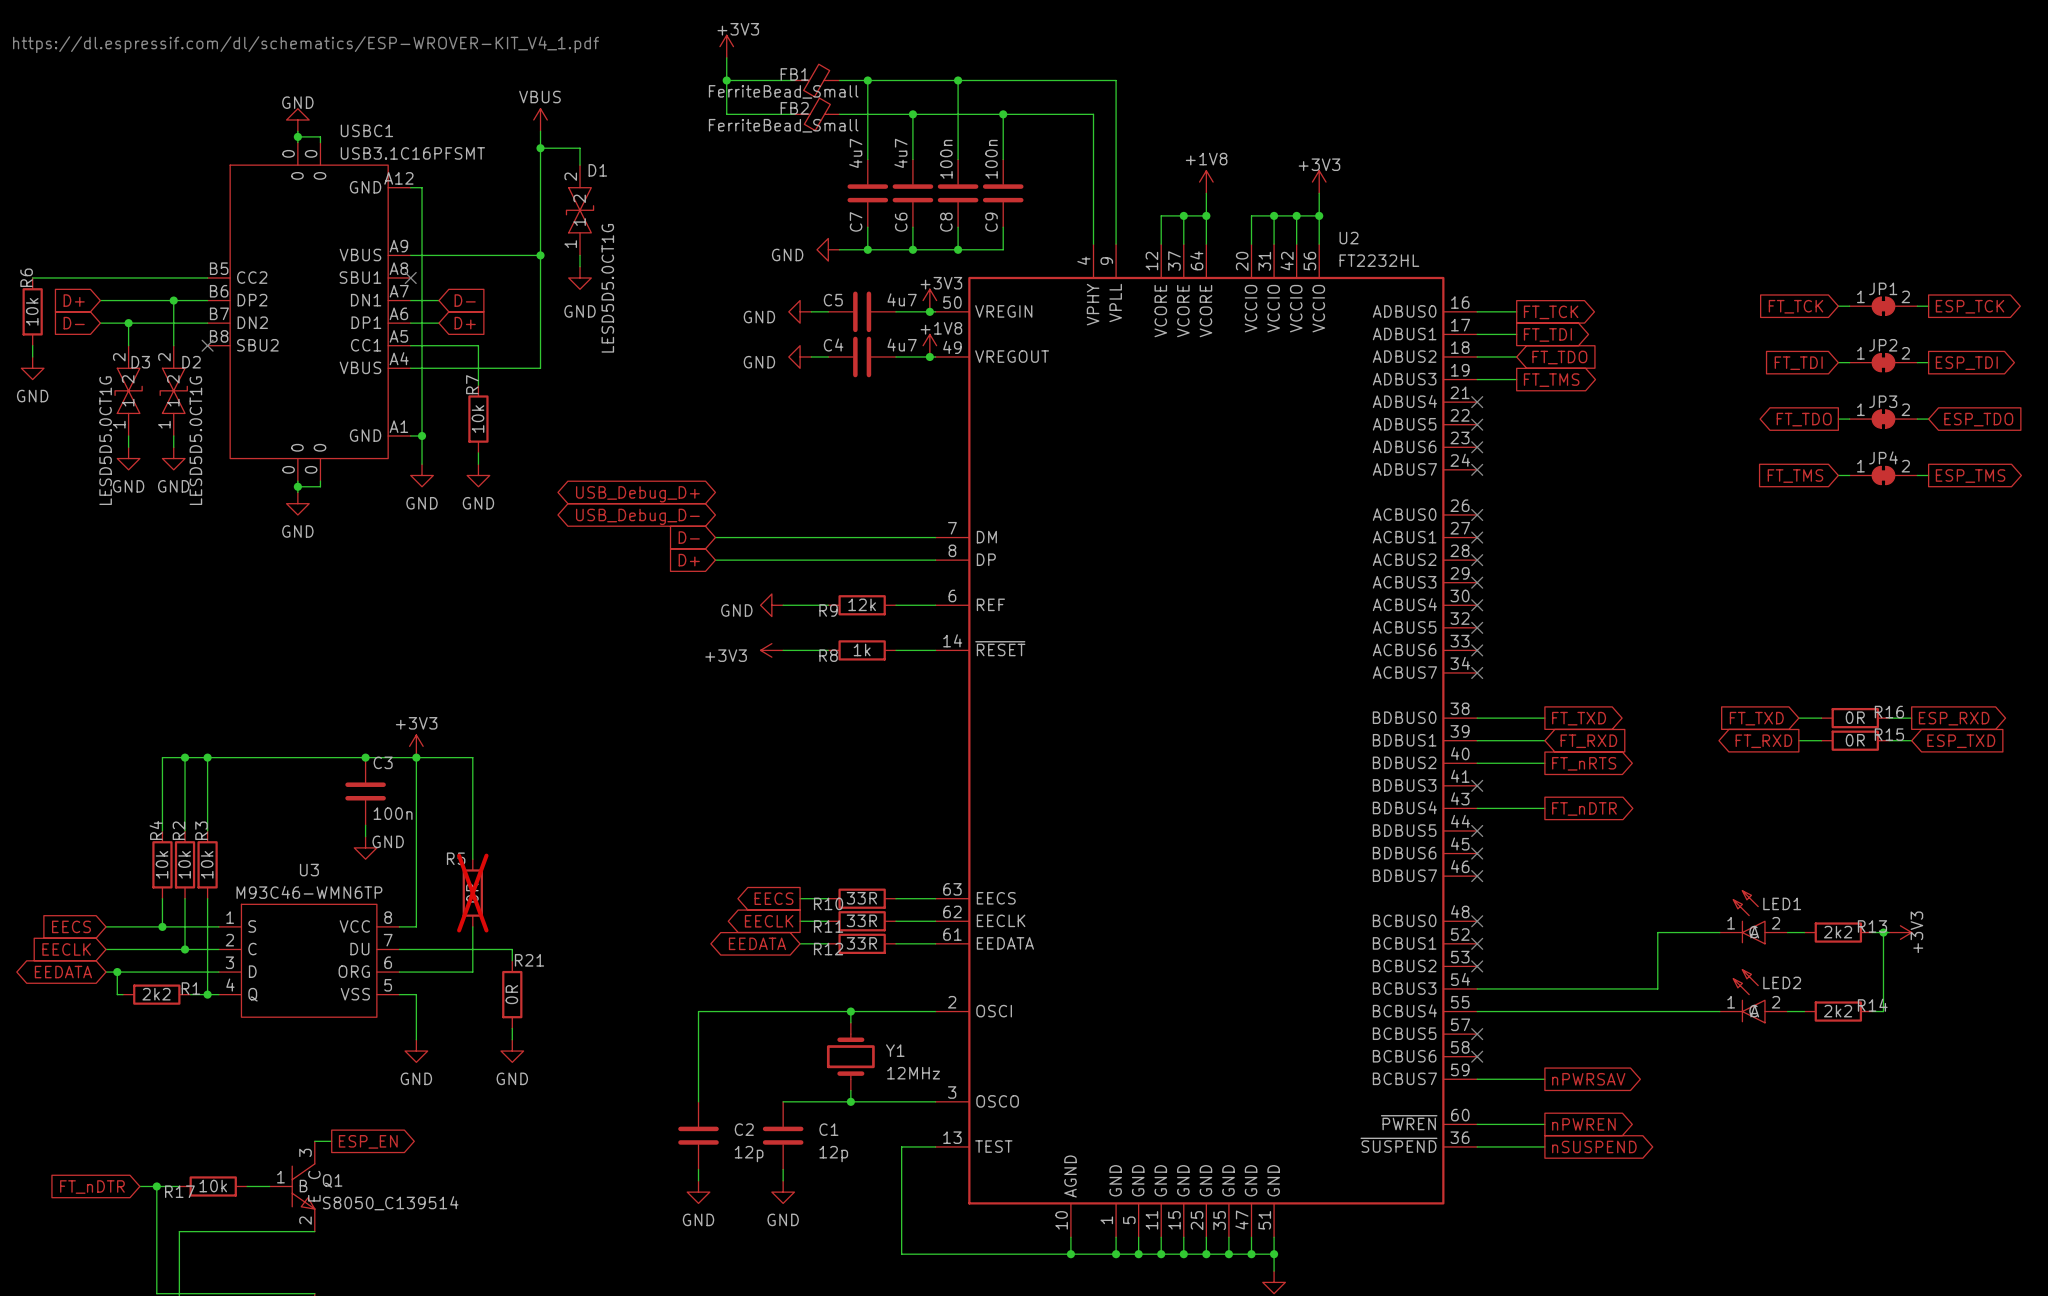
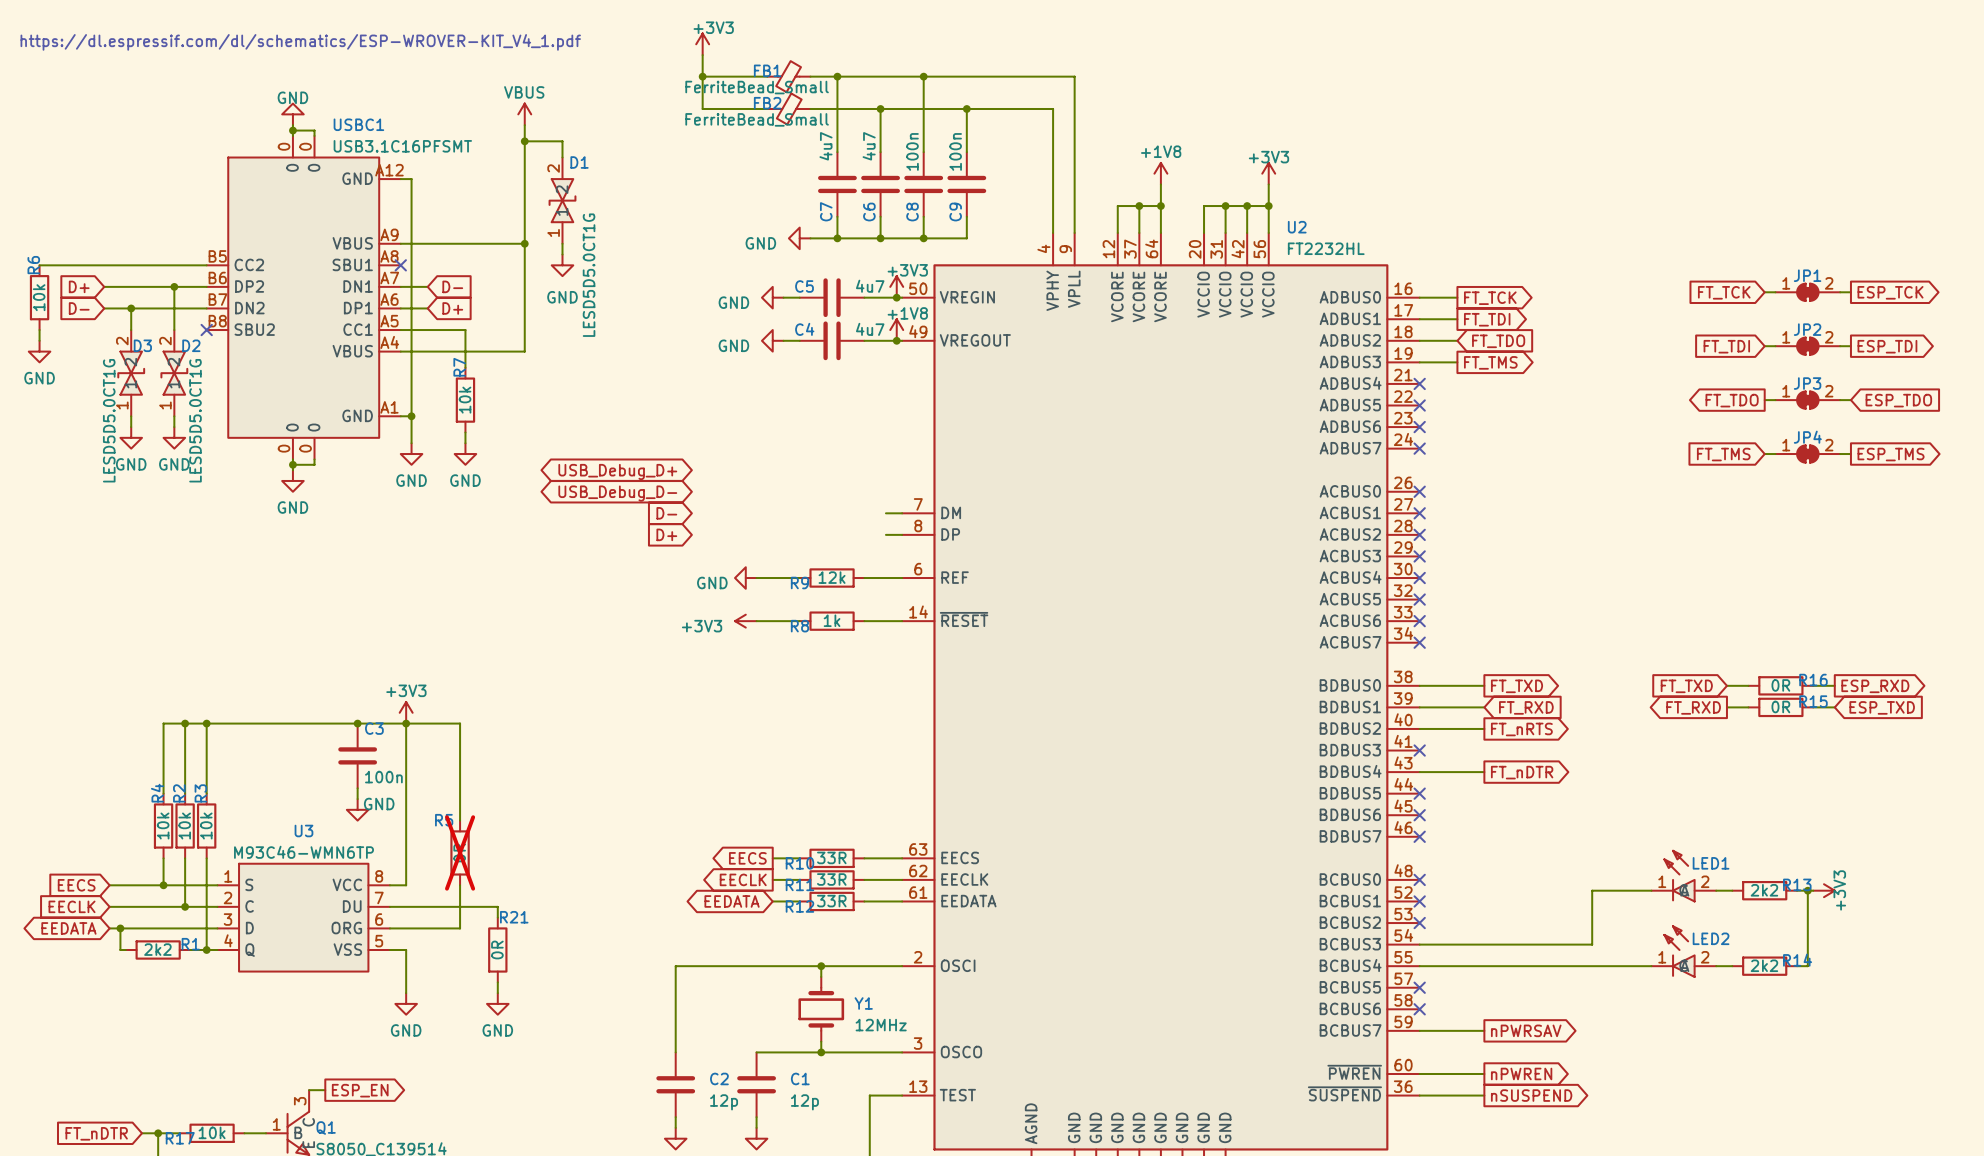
wire: (715, 537) (918, 537) -> none
wire: (715, 560) (918, 560) -> none

